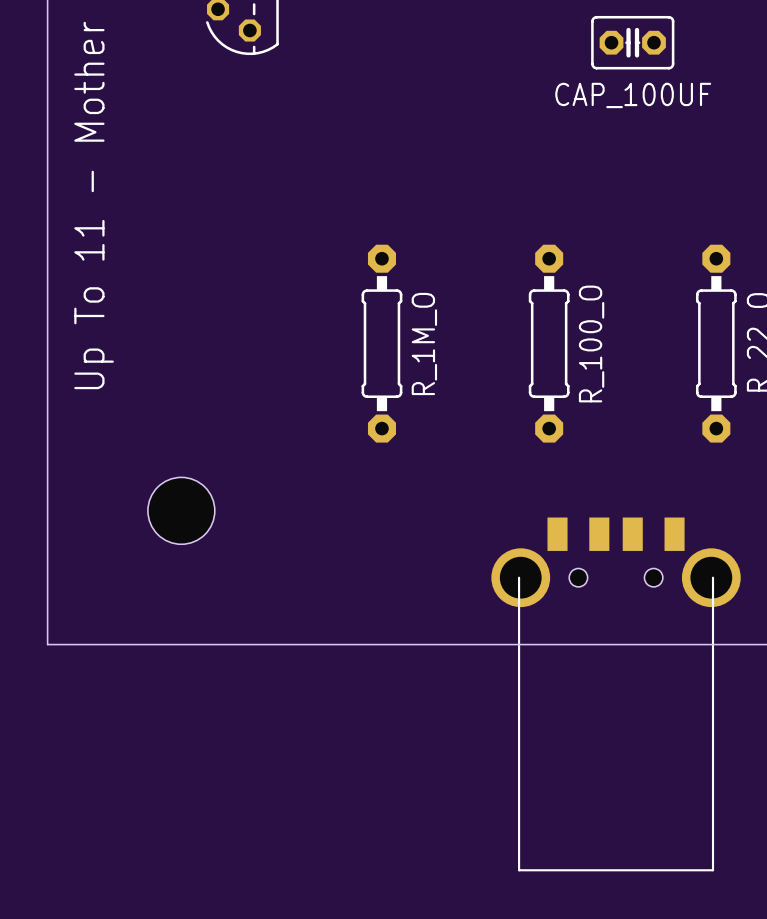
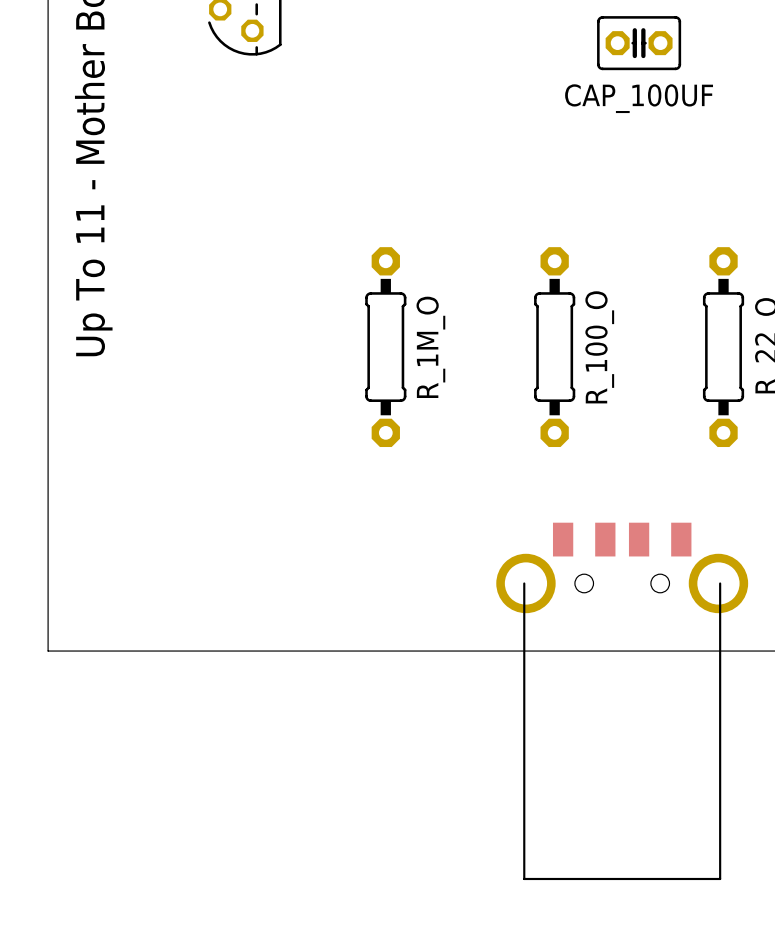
hole: (181, 510) -> none

